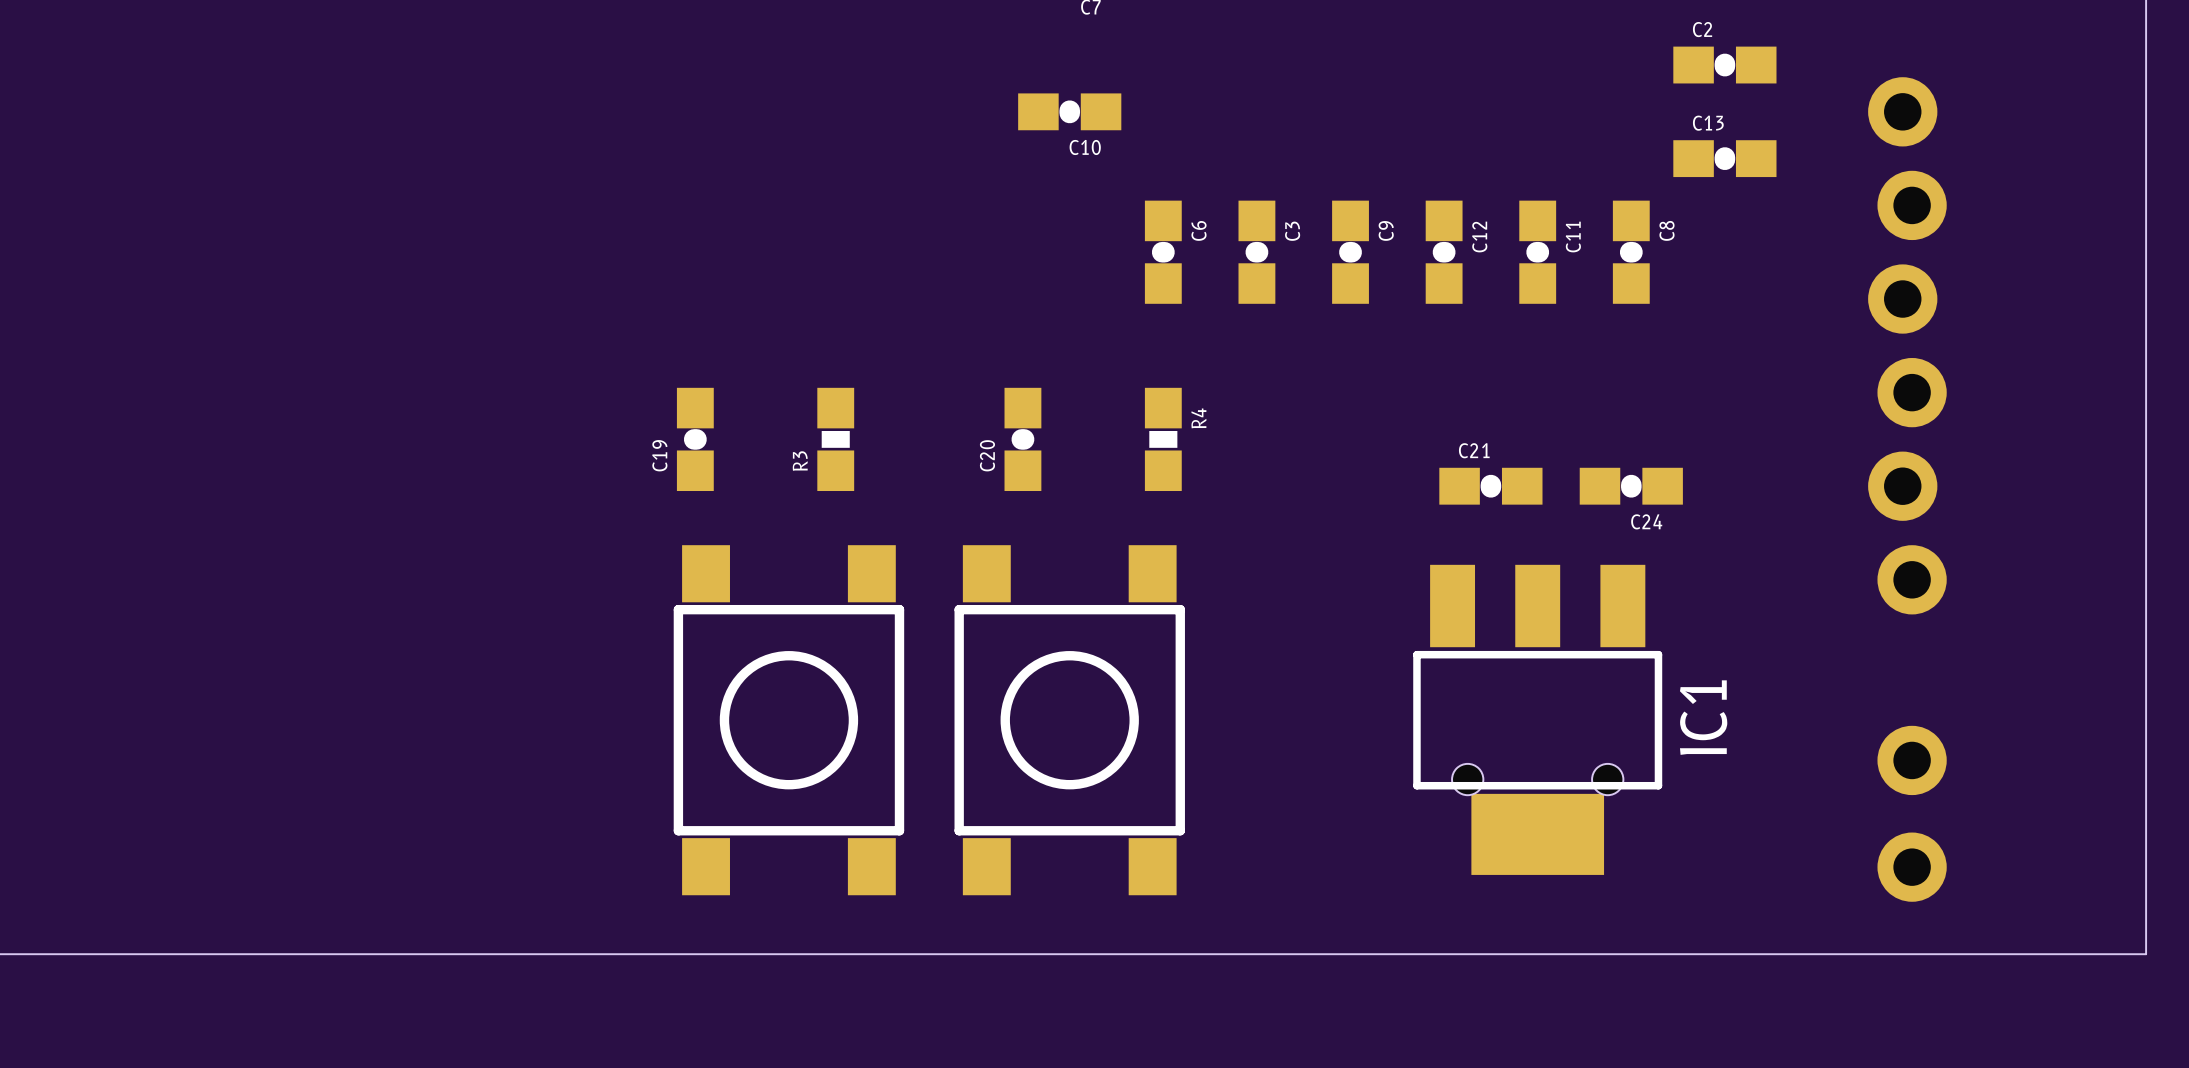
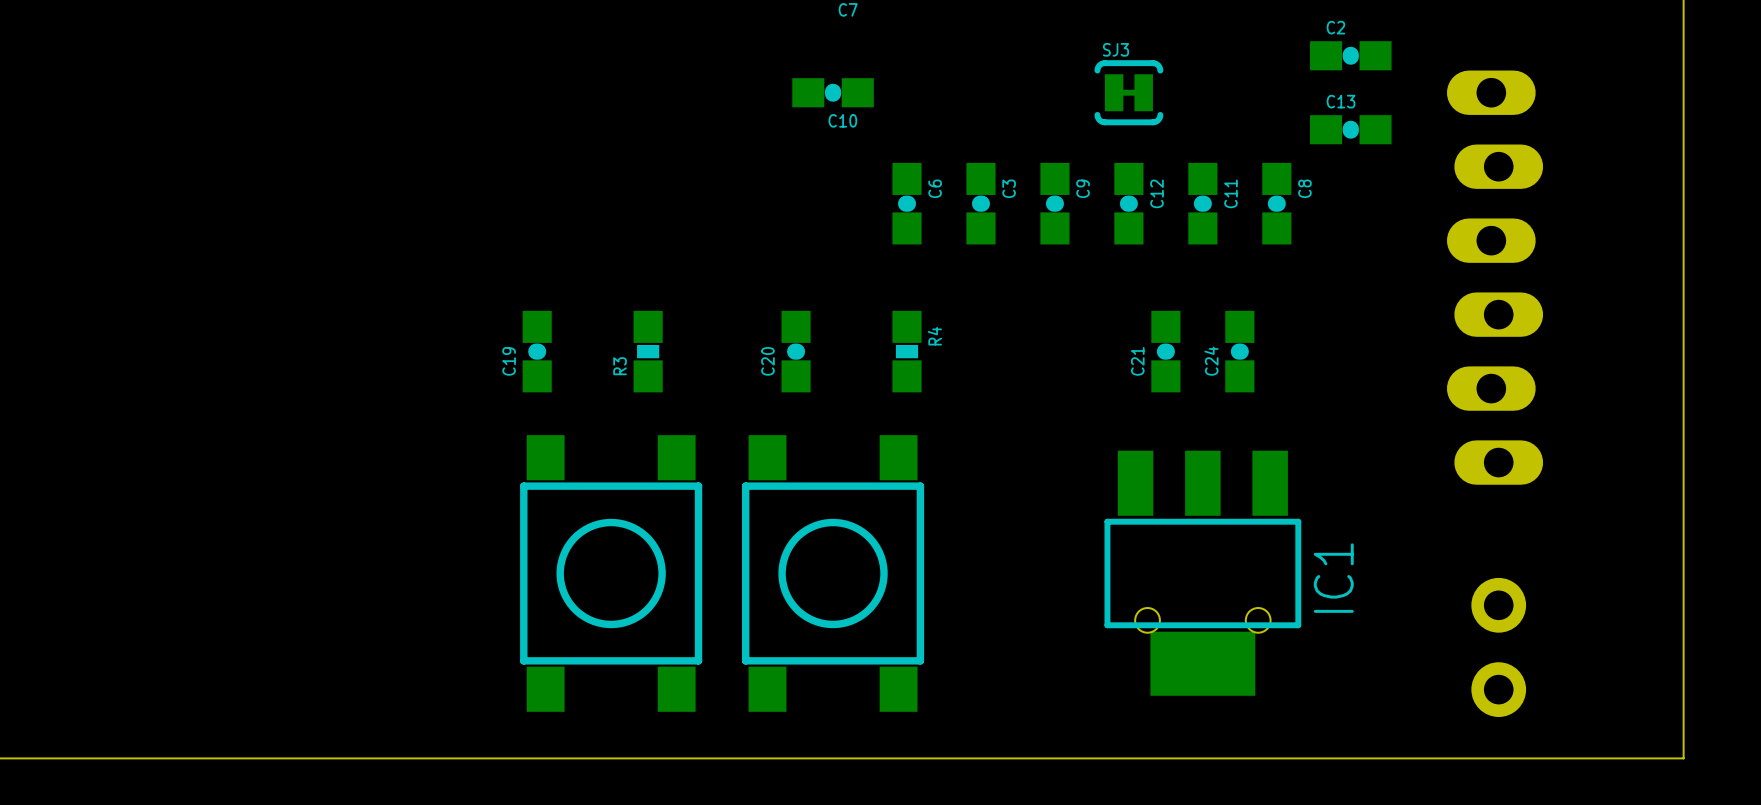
part footprint: [1868, 77, 1947, 615] -> [1446, 70, 1544, 485]
SJ3: none -> (1128, 92)
C21 rotation: 0° (1490, 486) -> 90° clockwise (1165, 351)
C24 rotation: 0° (1631, 486) -> 90° clockwise (1239, 351)
C24 position: (1631, 486) -> (1239, 351)

